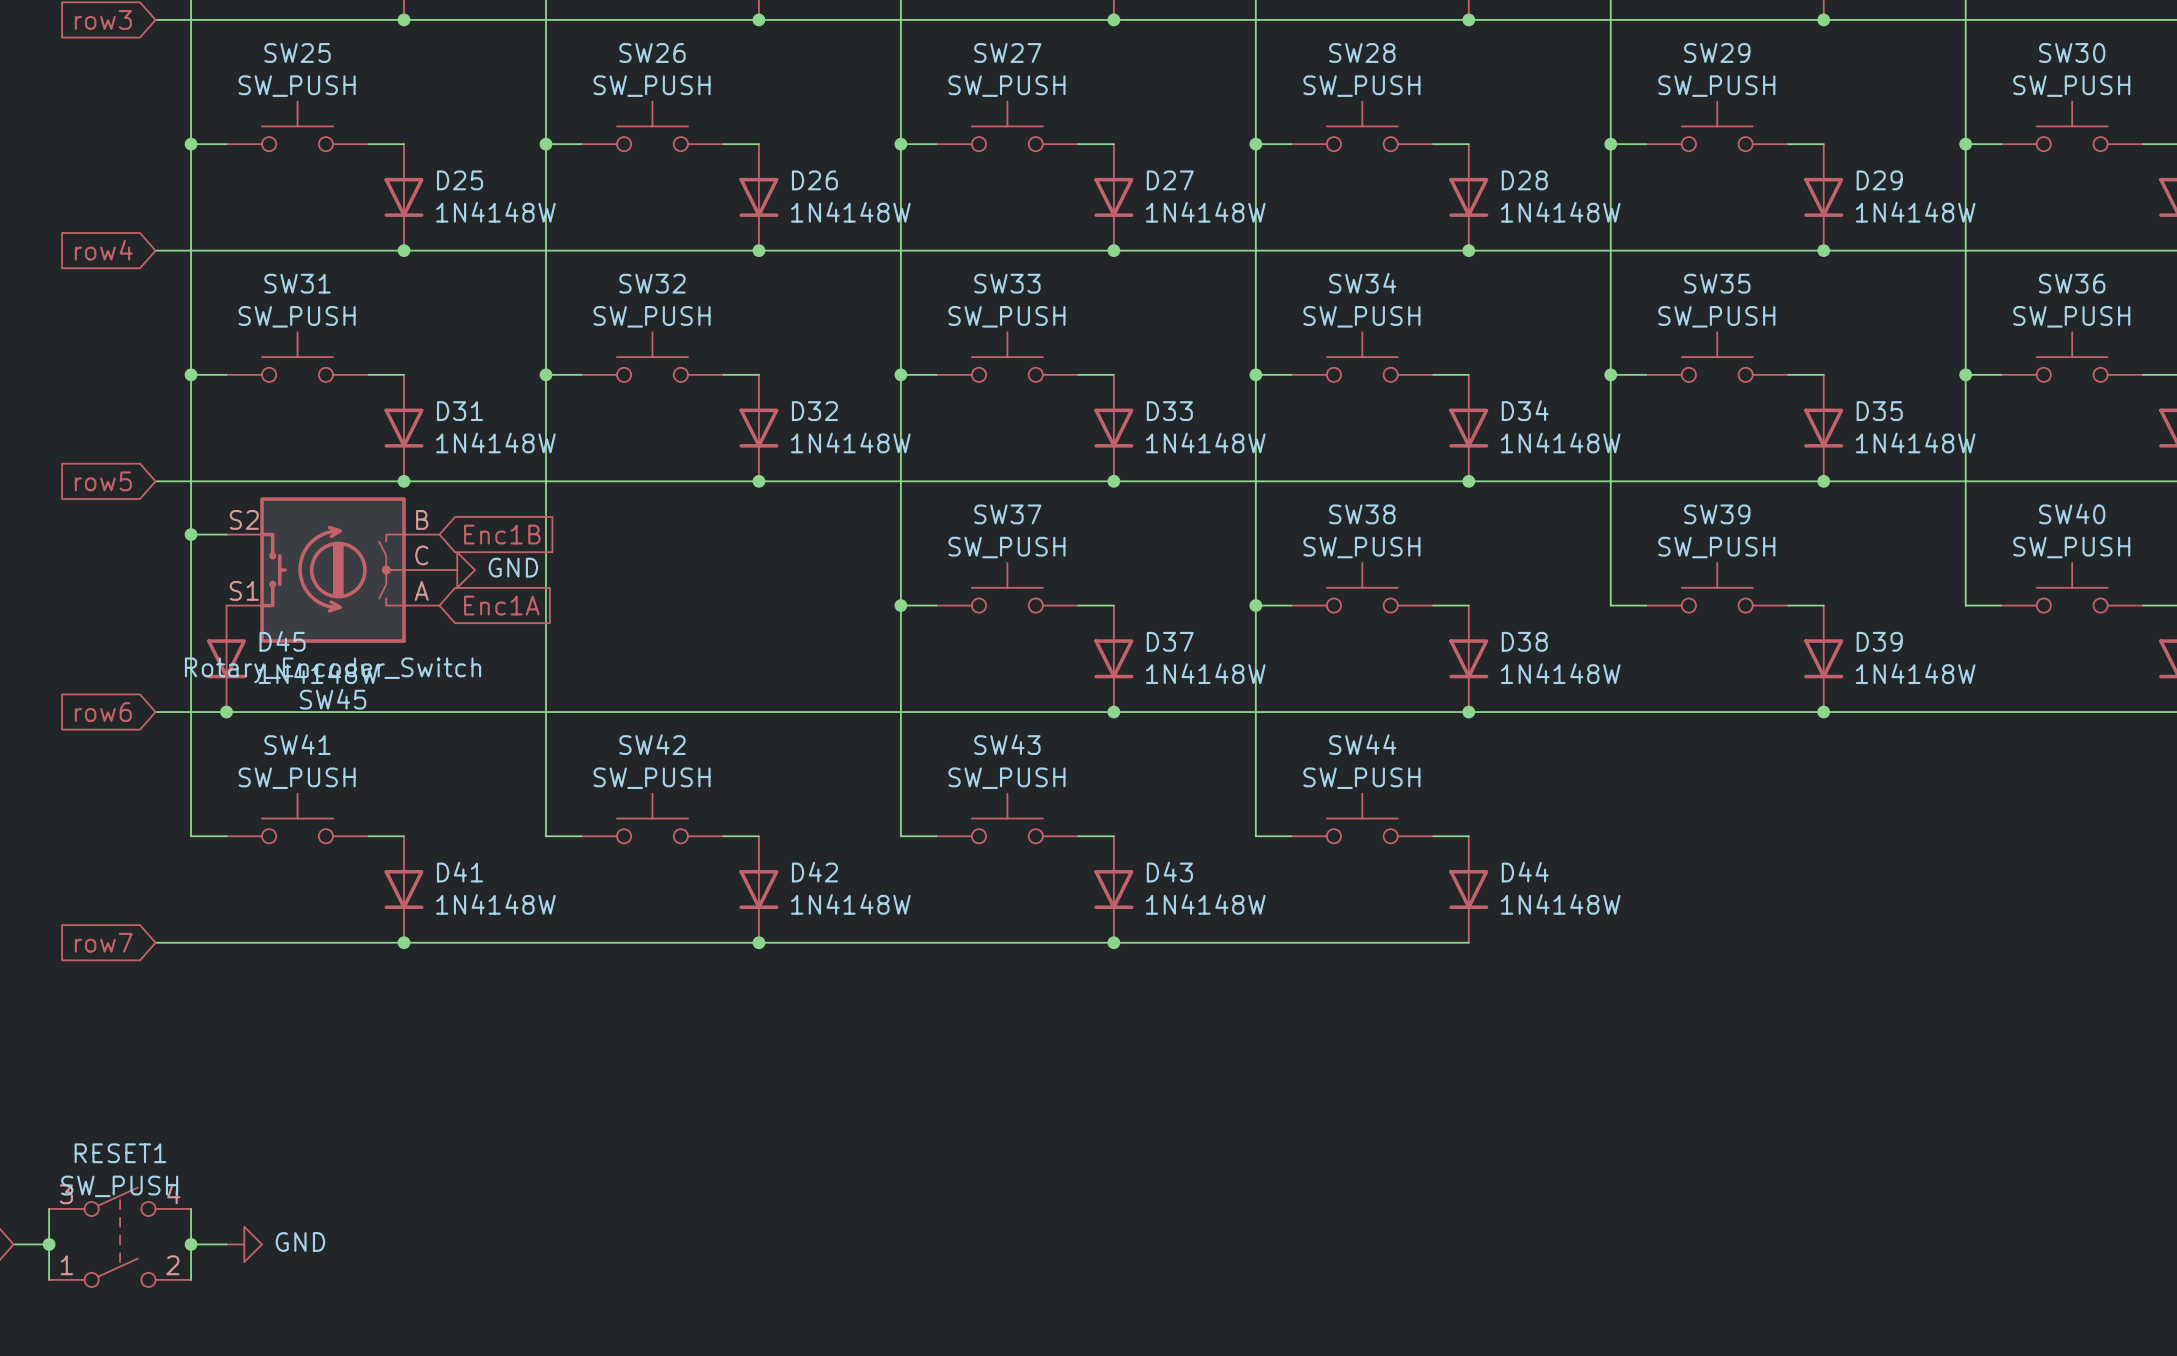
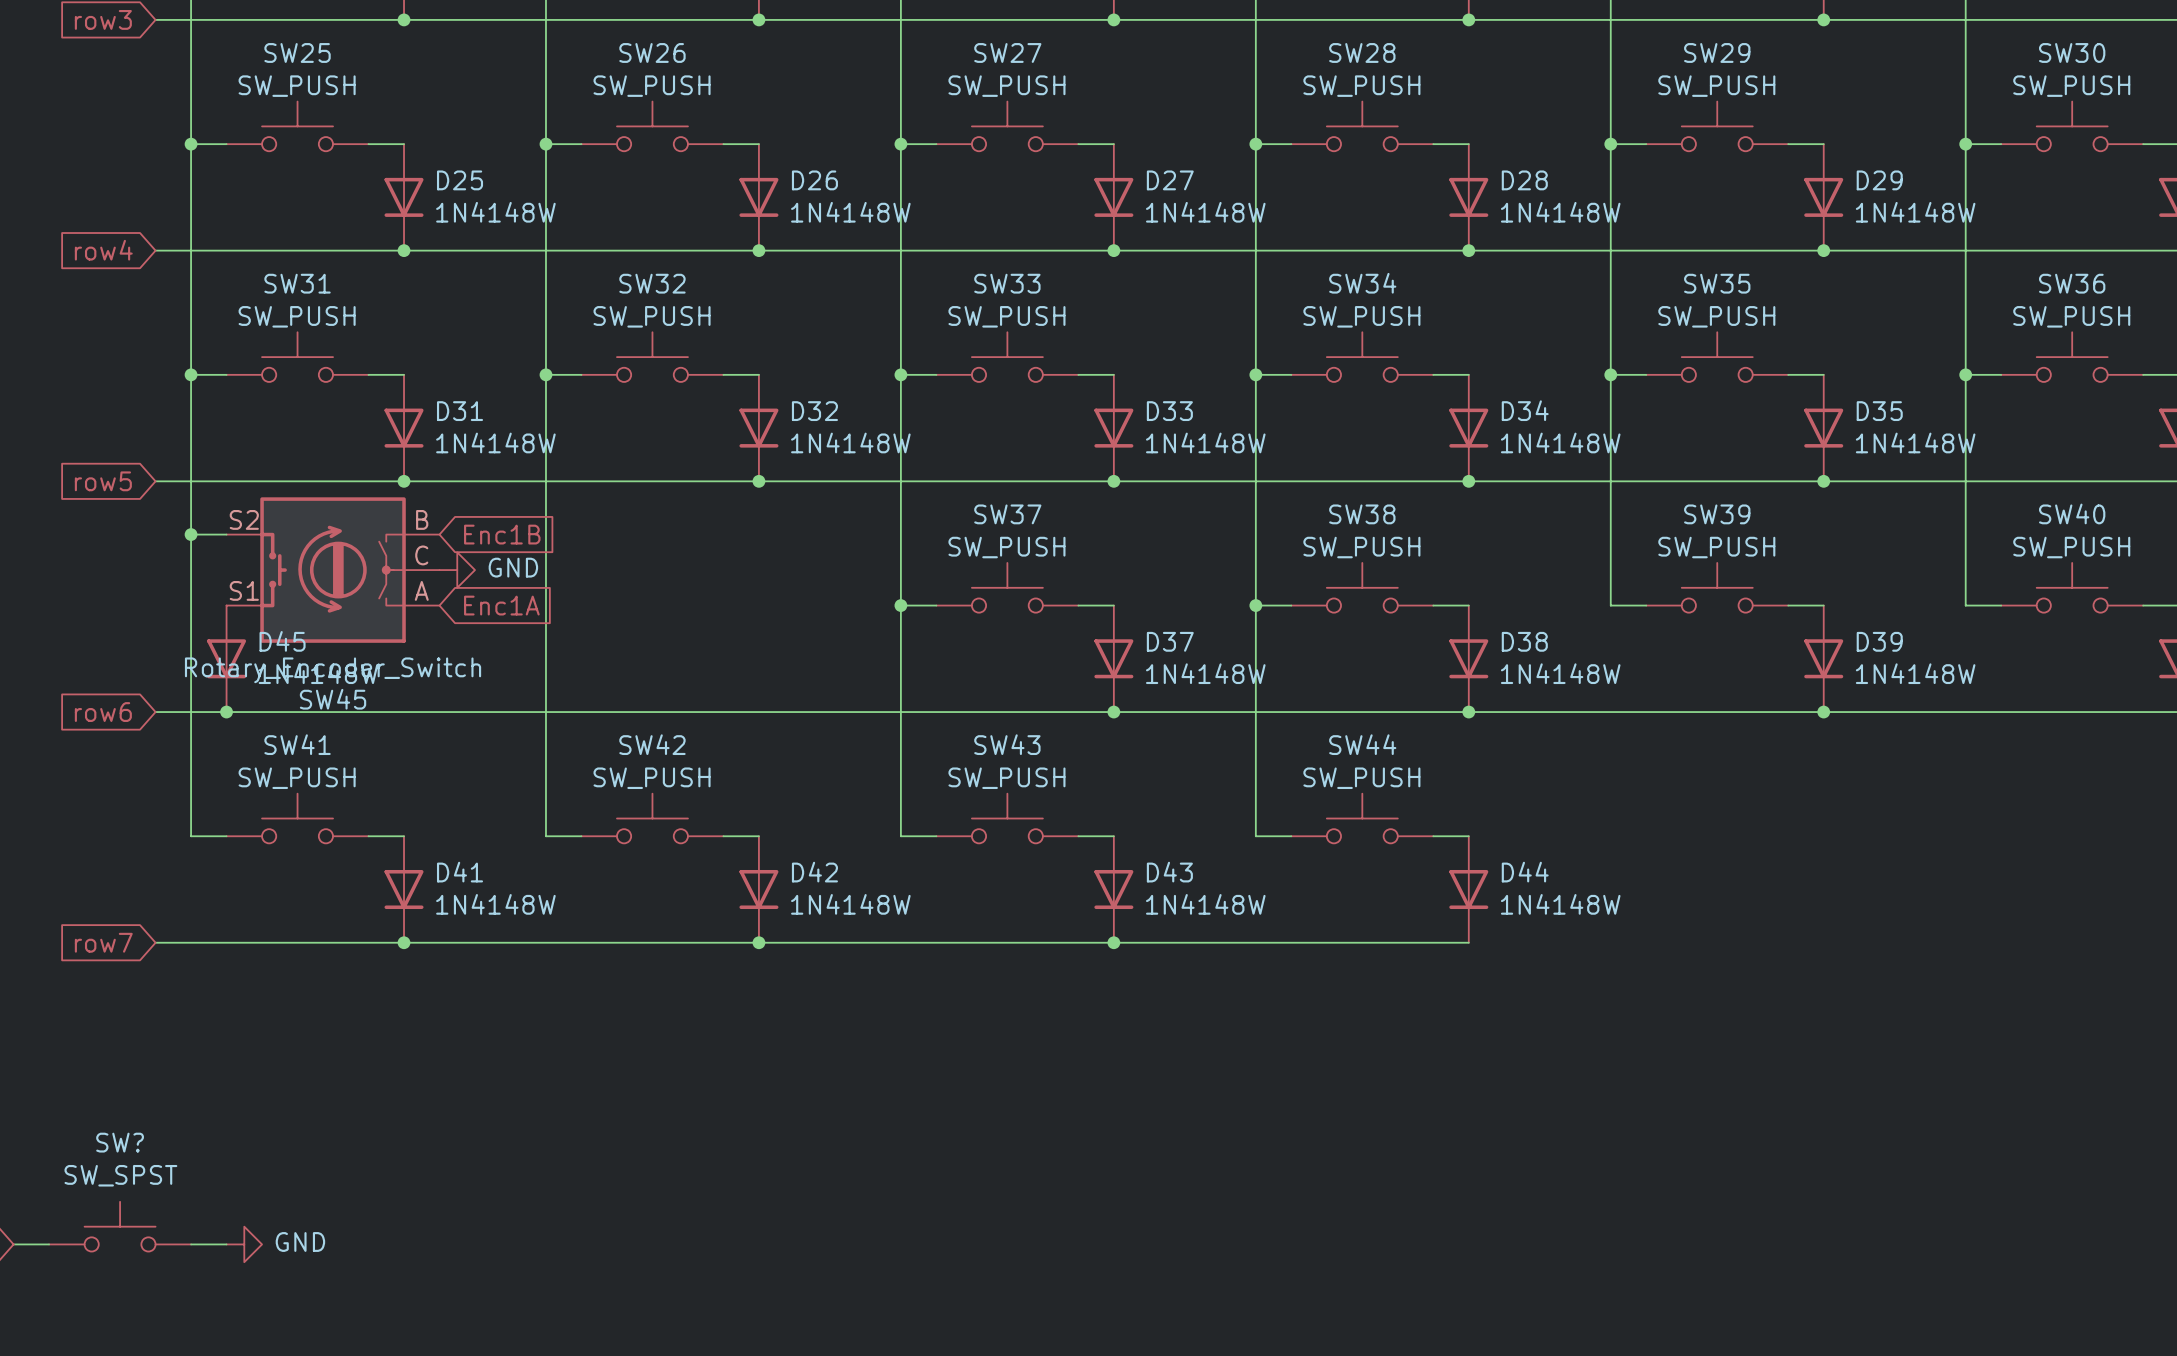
wire: (49, 1208) (49, 1279) -> none
wire: (191, 1208) (191, 1279) -> none
SW?: none -> SW_SPST (120, 1226)
RESET1: SW_PUSH (120, 1237) -> none
junction: (49, 1244) -> none
junction: (191, 1244) -> none

